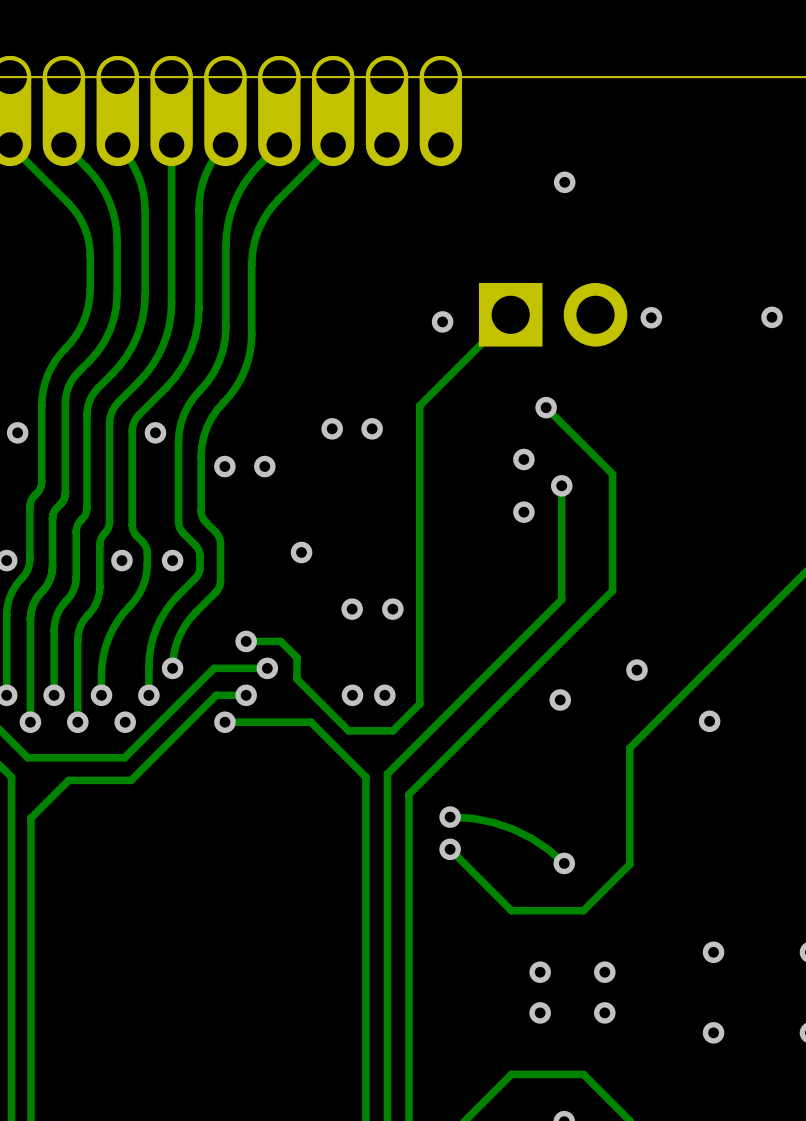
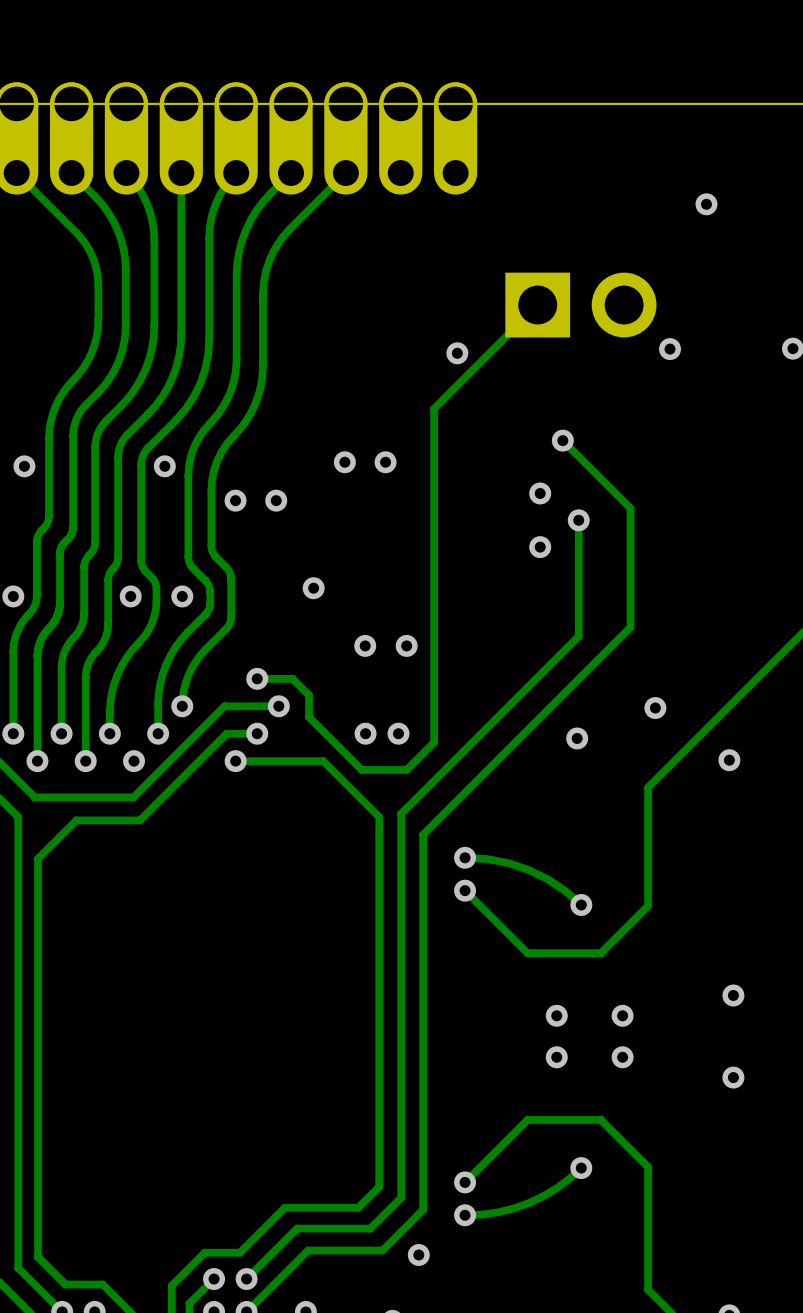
via position: (564, 182) -> (706, 204)
track: (510, 314) (419, 405) -> (537, 305) (434, 408) (434, 438)
part position: (553, 314) -> (580, 305)

